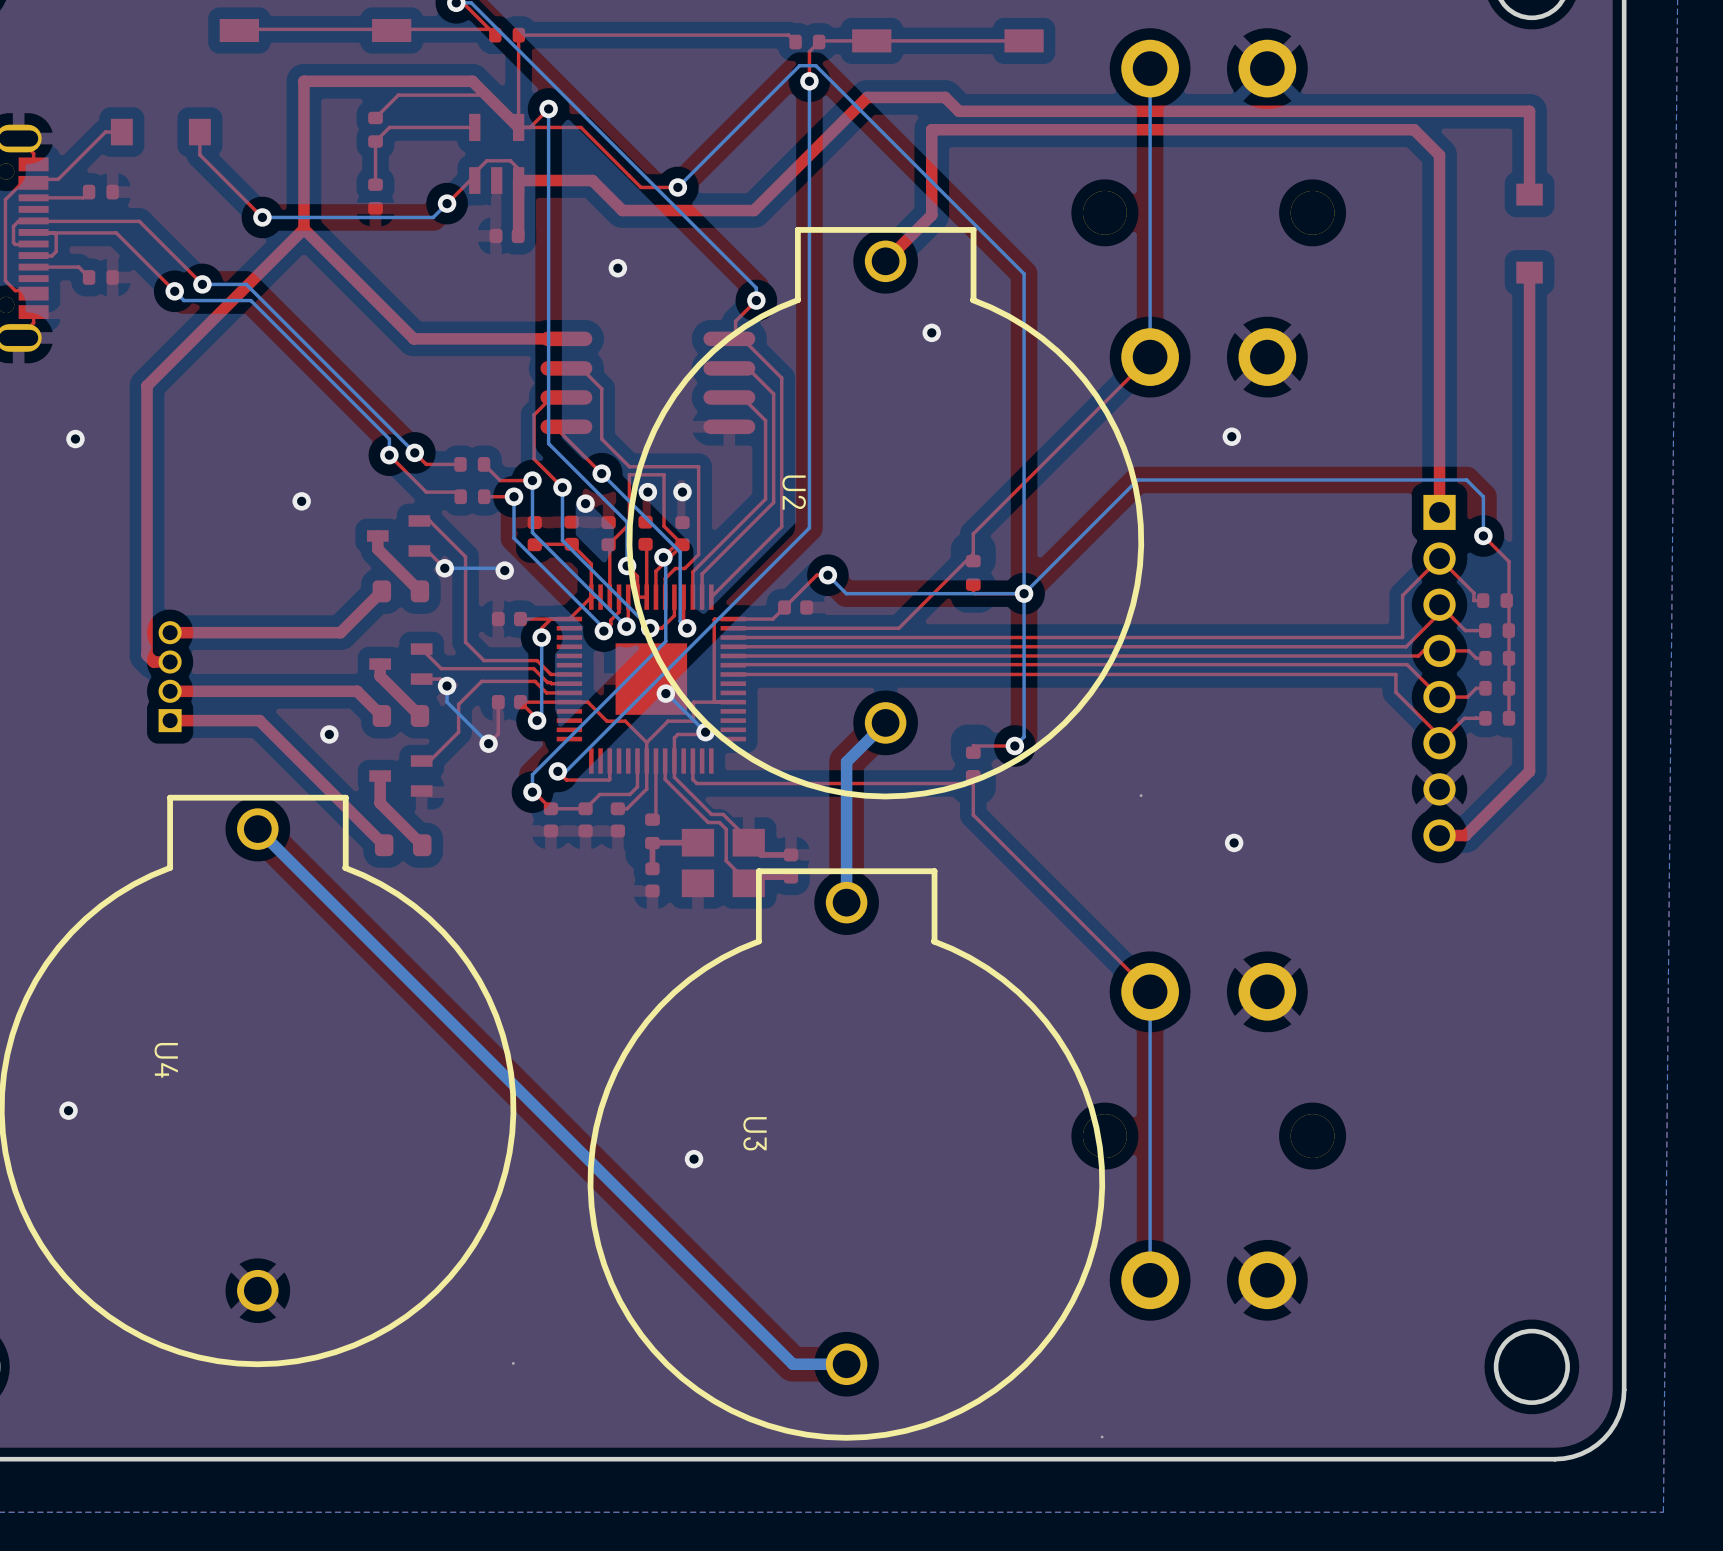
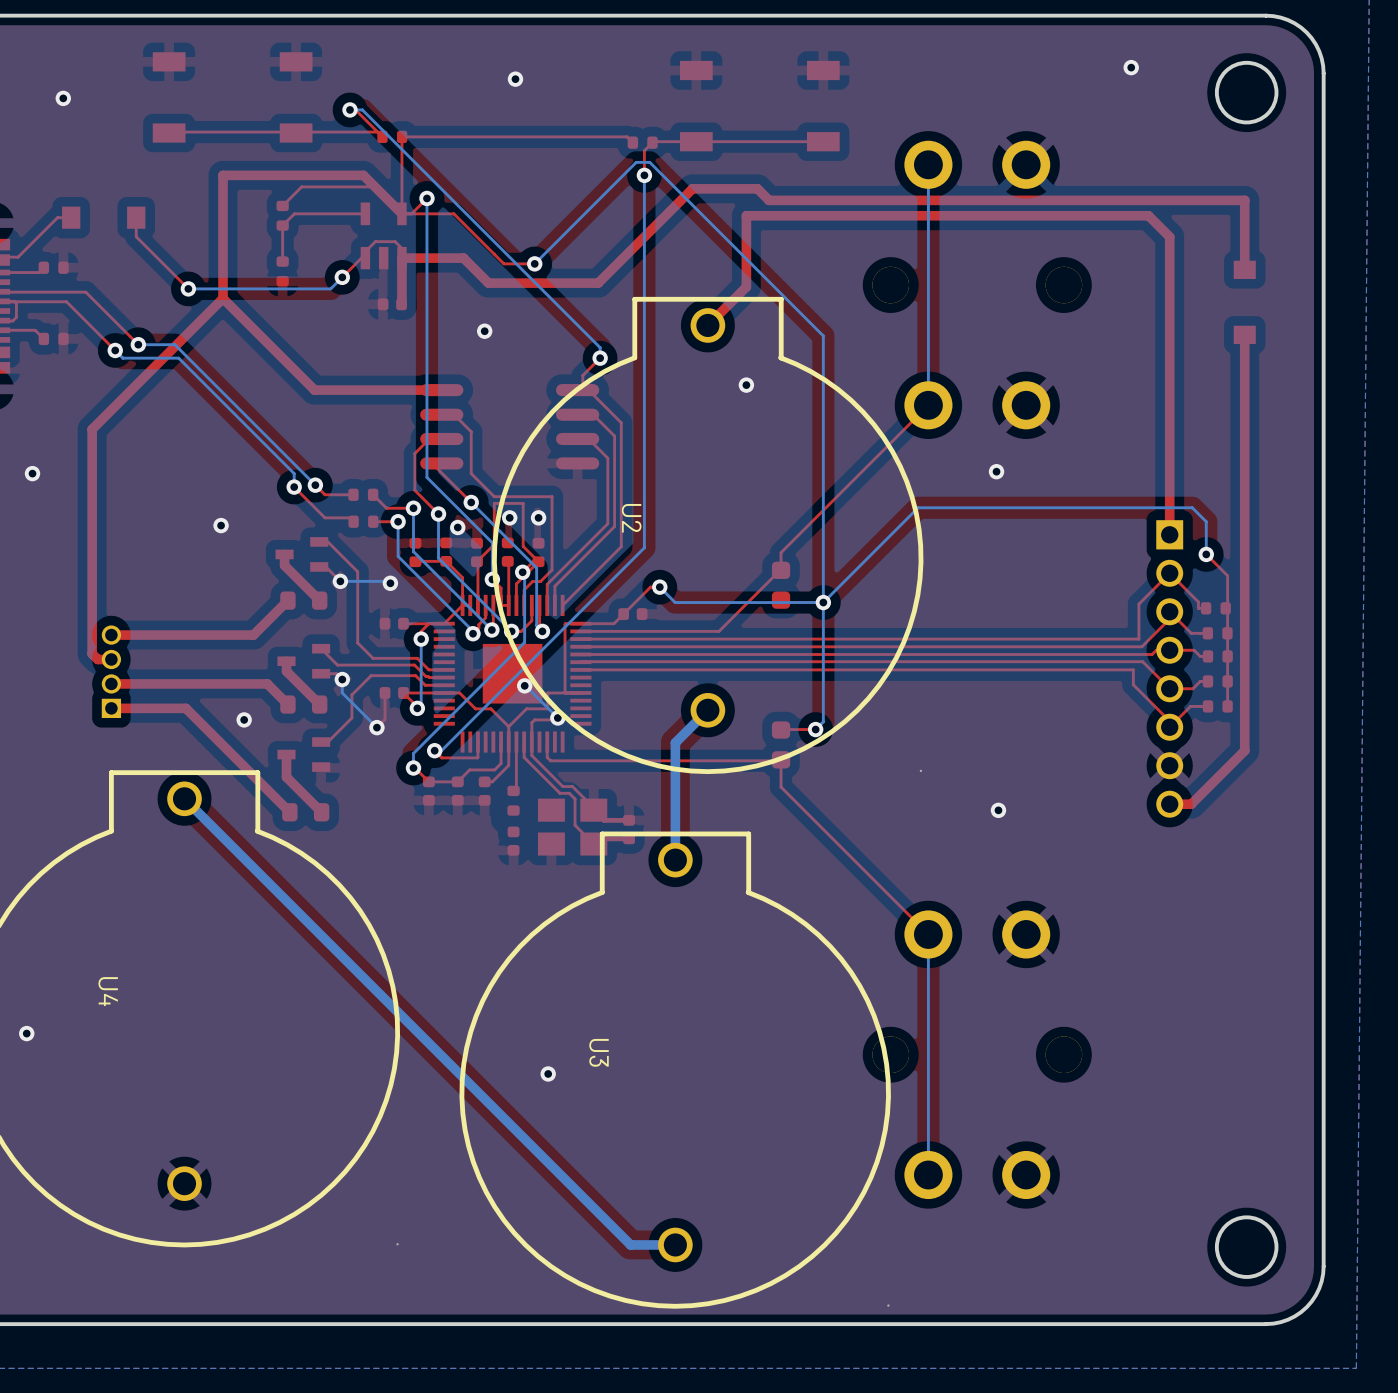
part footprint: [965, 554, 981, 591] -> [771, 561, 791, 609]
part footprint: [965, 746, 981, 783] -> [771, 721, 791, 769]
top track: (697, 842) (652, 842) (652, 868) -> none

